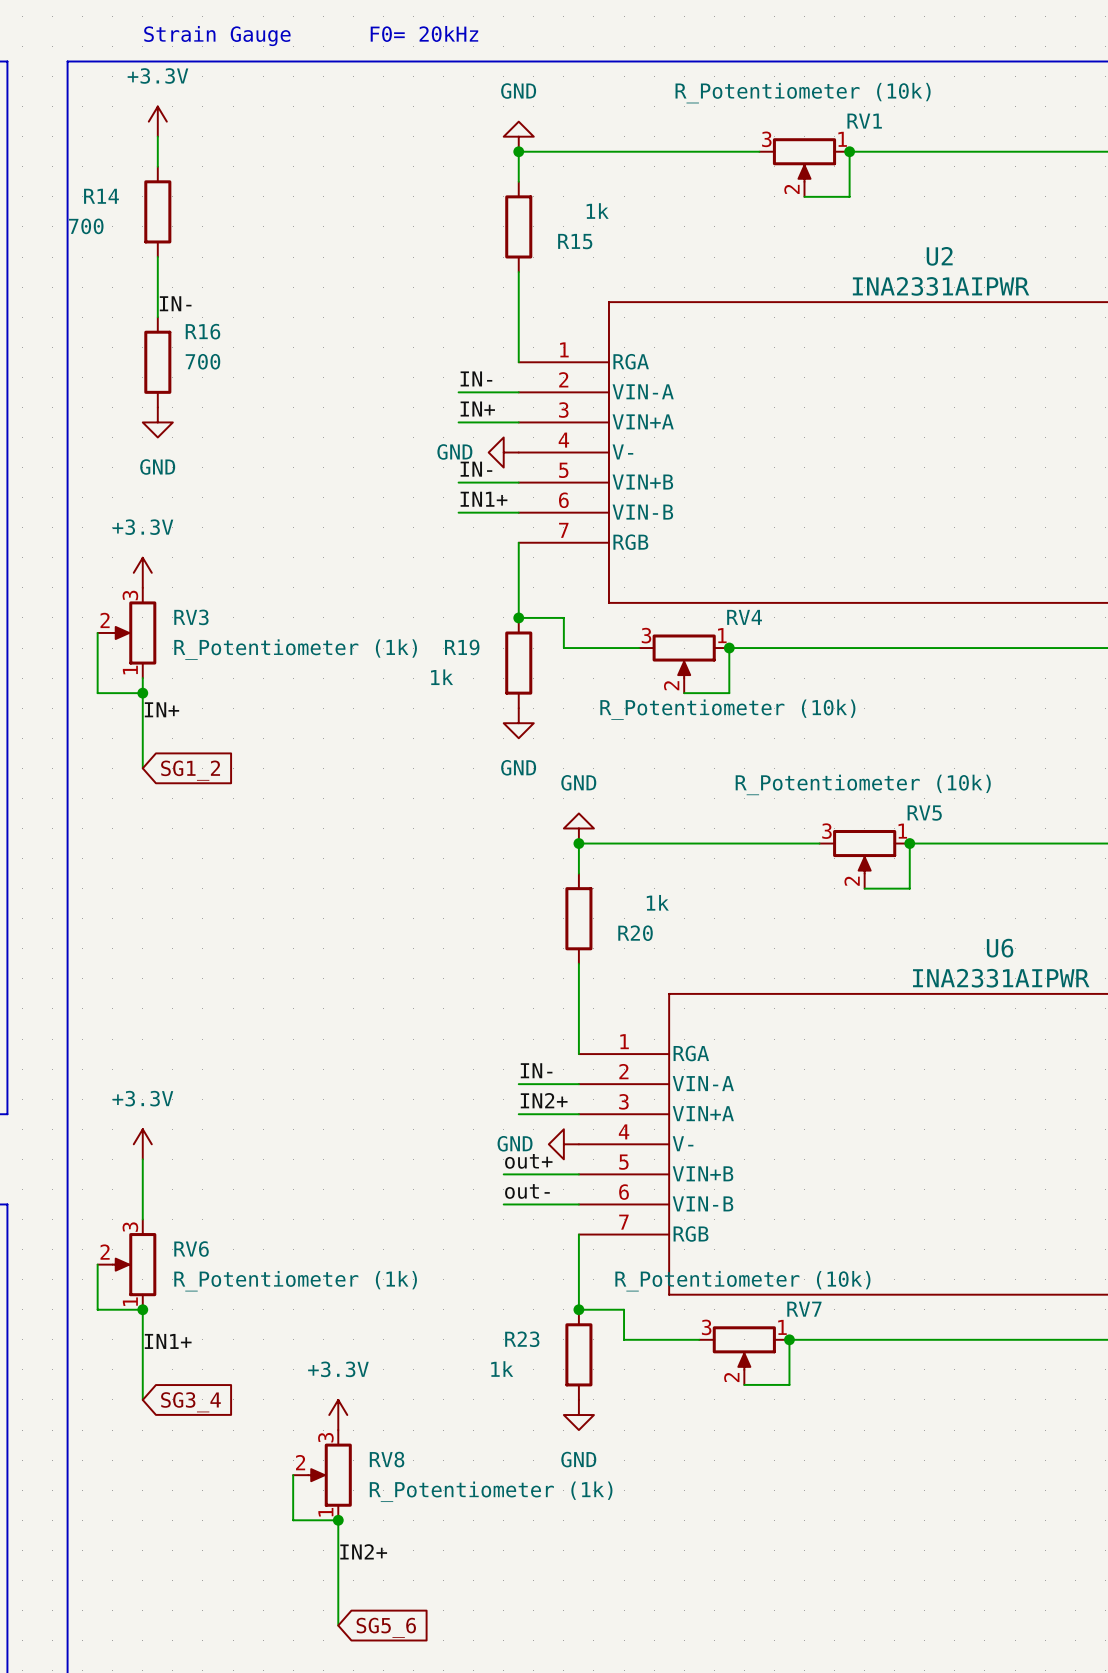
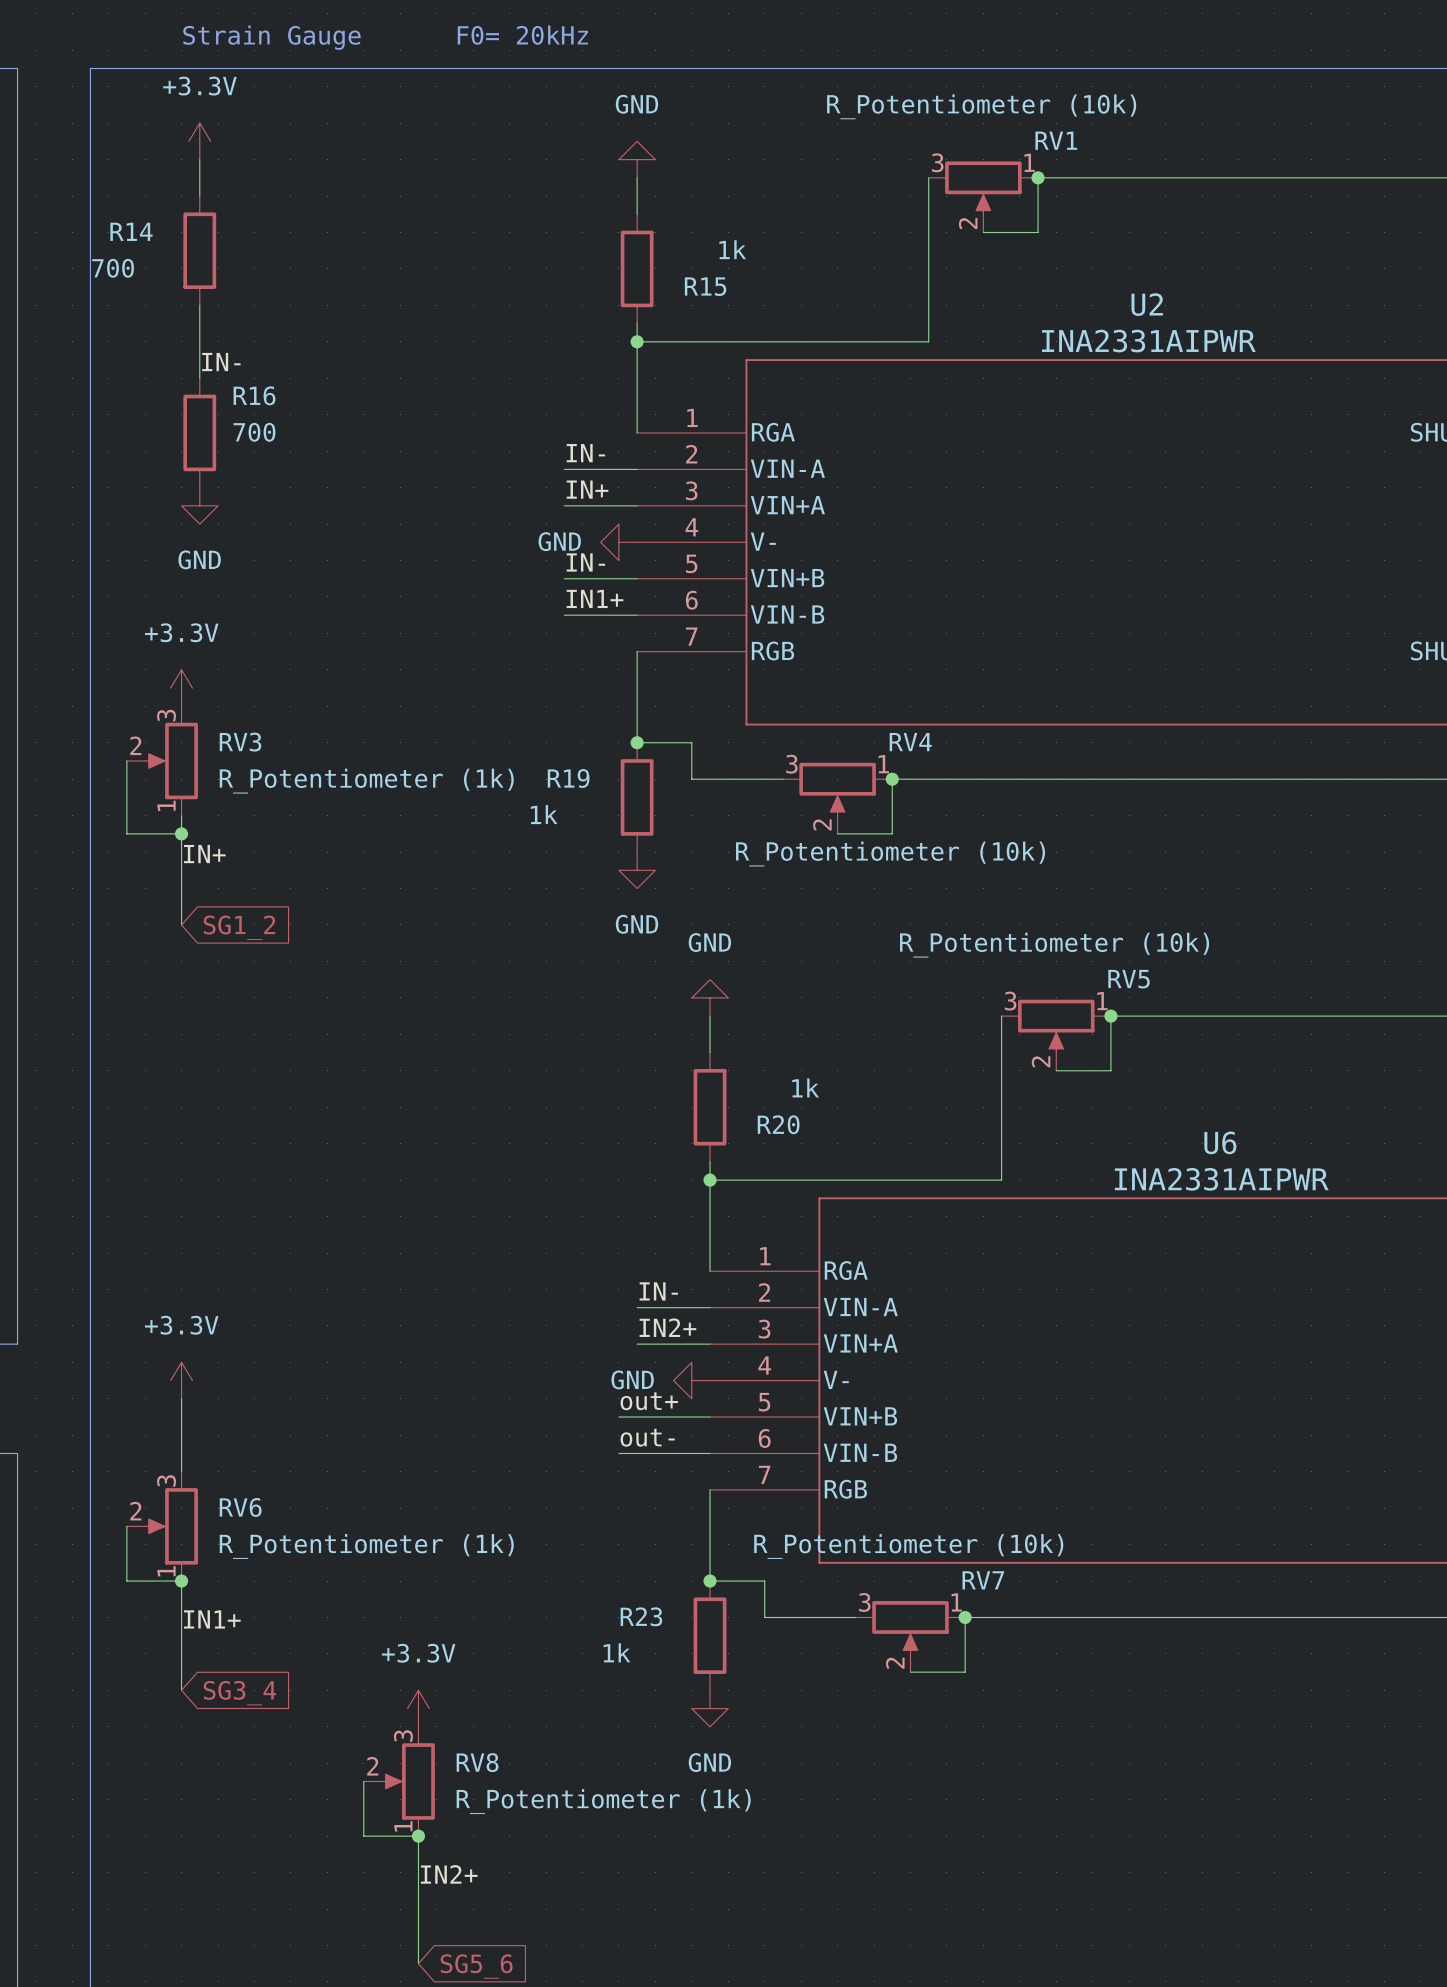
wire: (518, 151) (759, 151) -> (637, 341) (928, 341) (928, 177)
junction: (518, 151) -> none
junction: none -> (637, 341)
wire: (578, 843) (819, 843) -> (710, 1180) (1001, 1180) (1001, 1016)
junction: (578, 843) -> none
junction: none -> (710, 1180)

